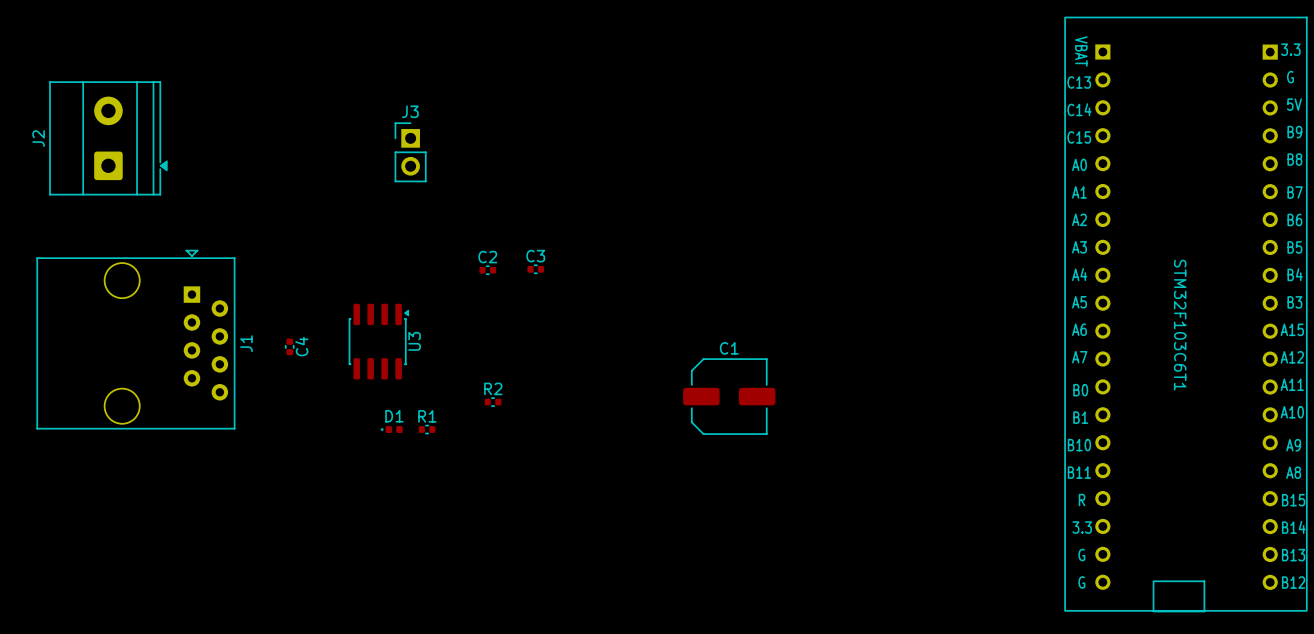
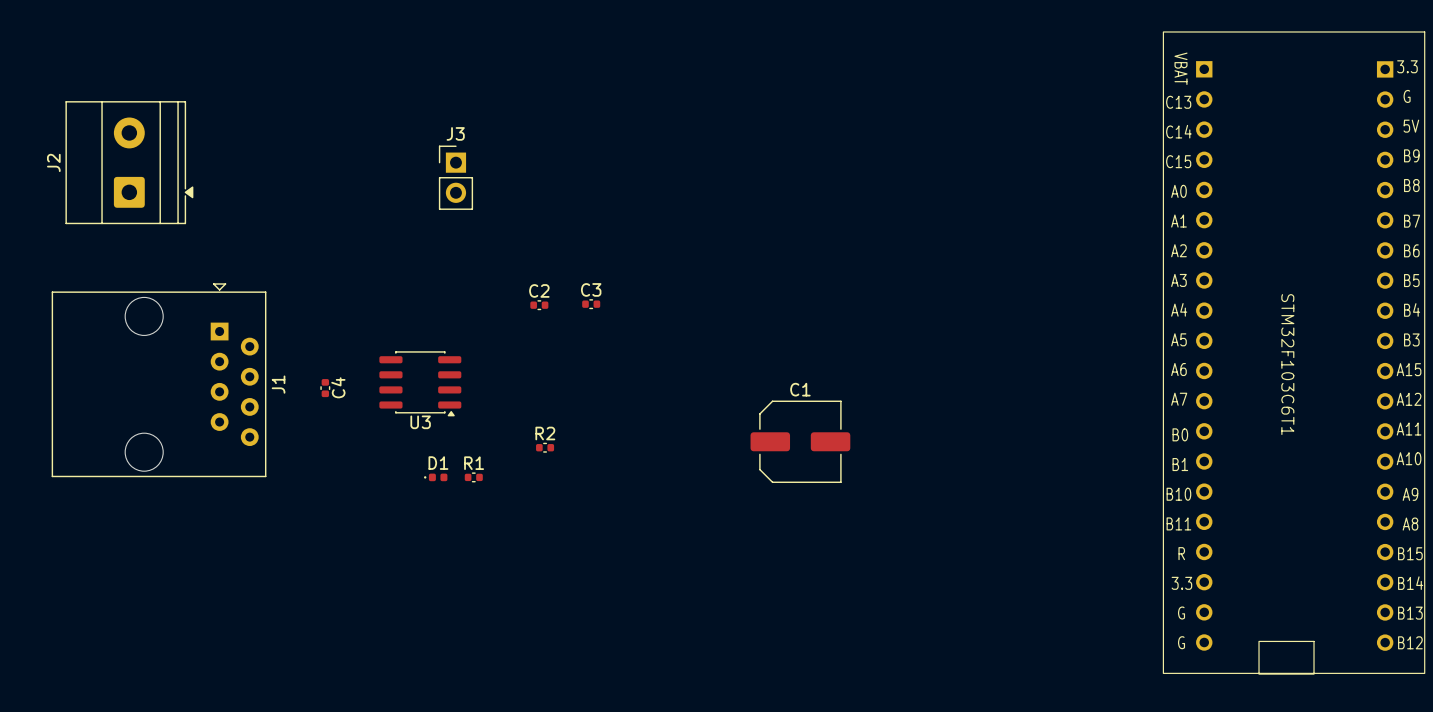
U3 rotation: 0° (378, 341) -> 90° clockwise (420, 383)

